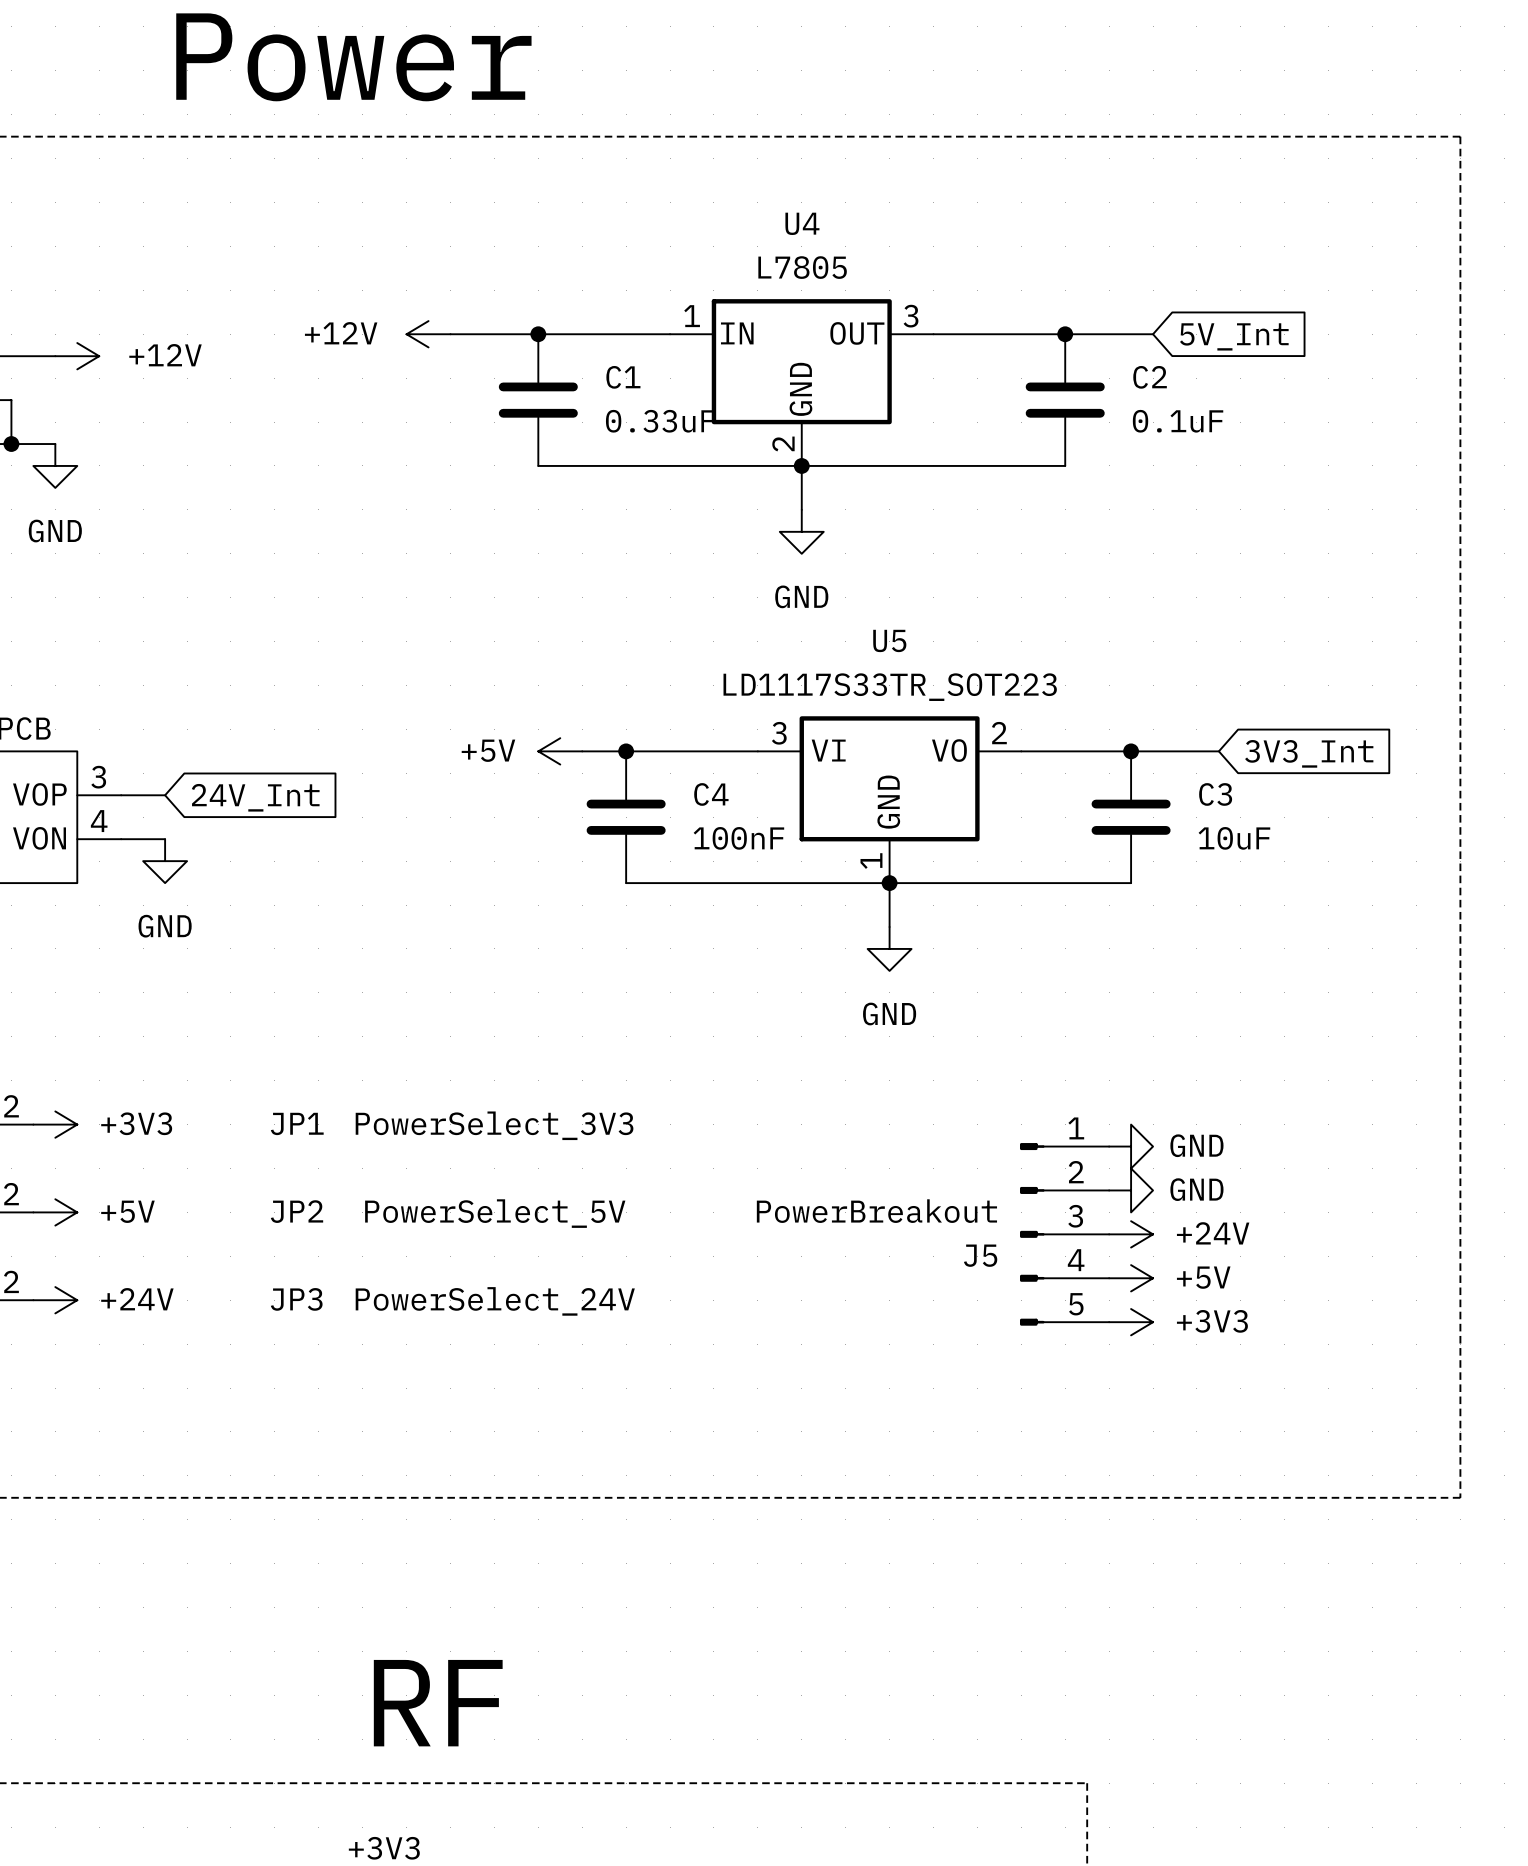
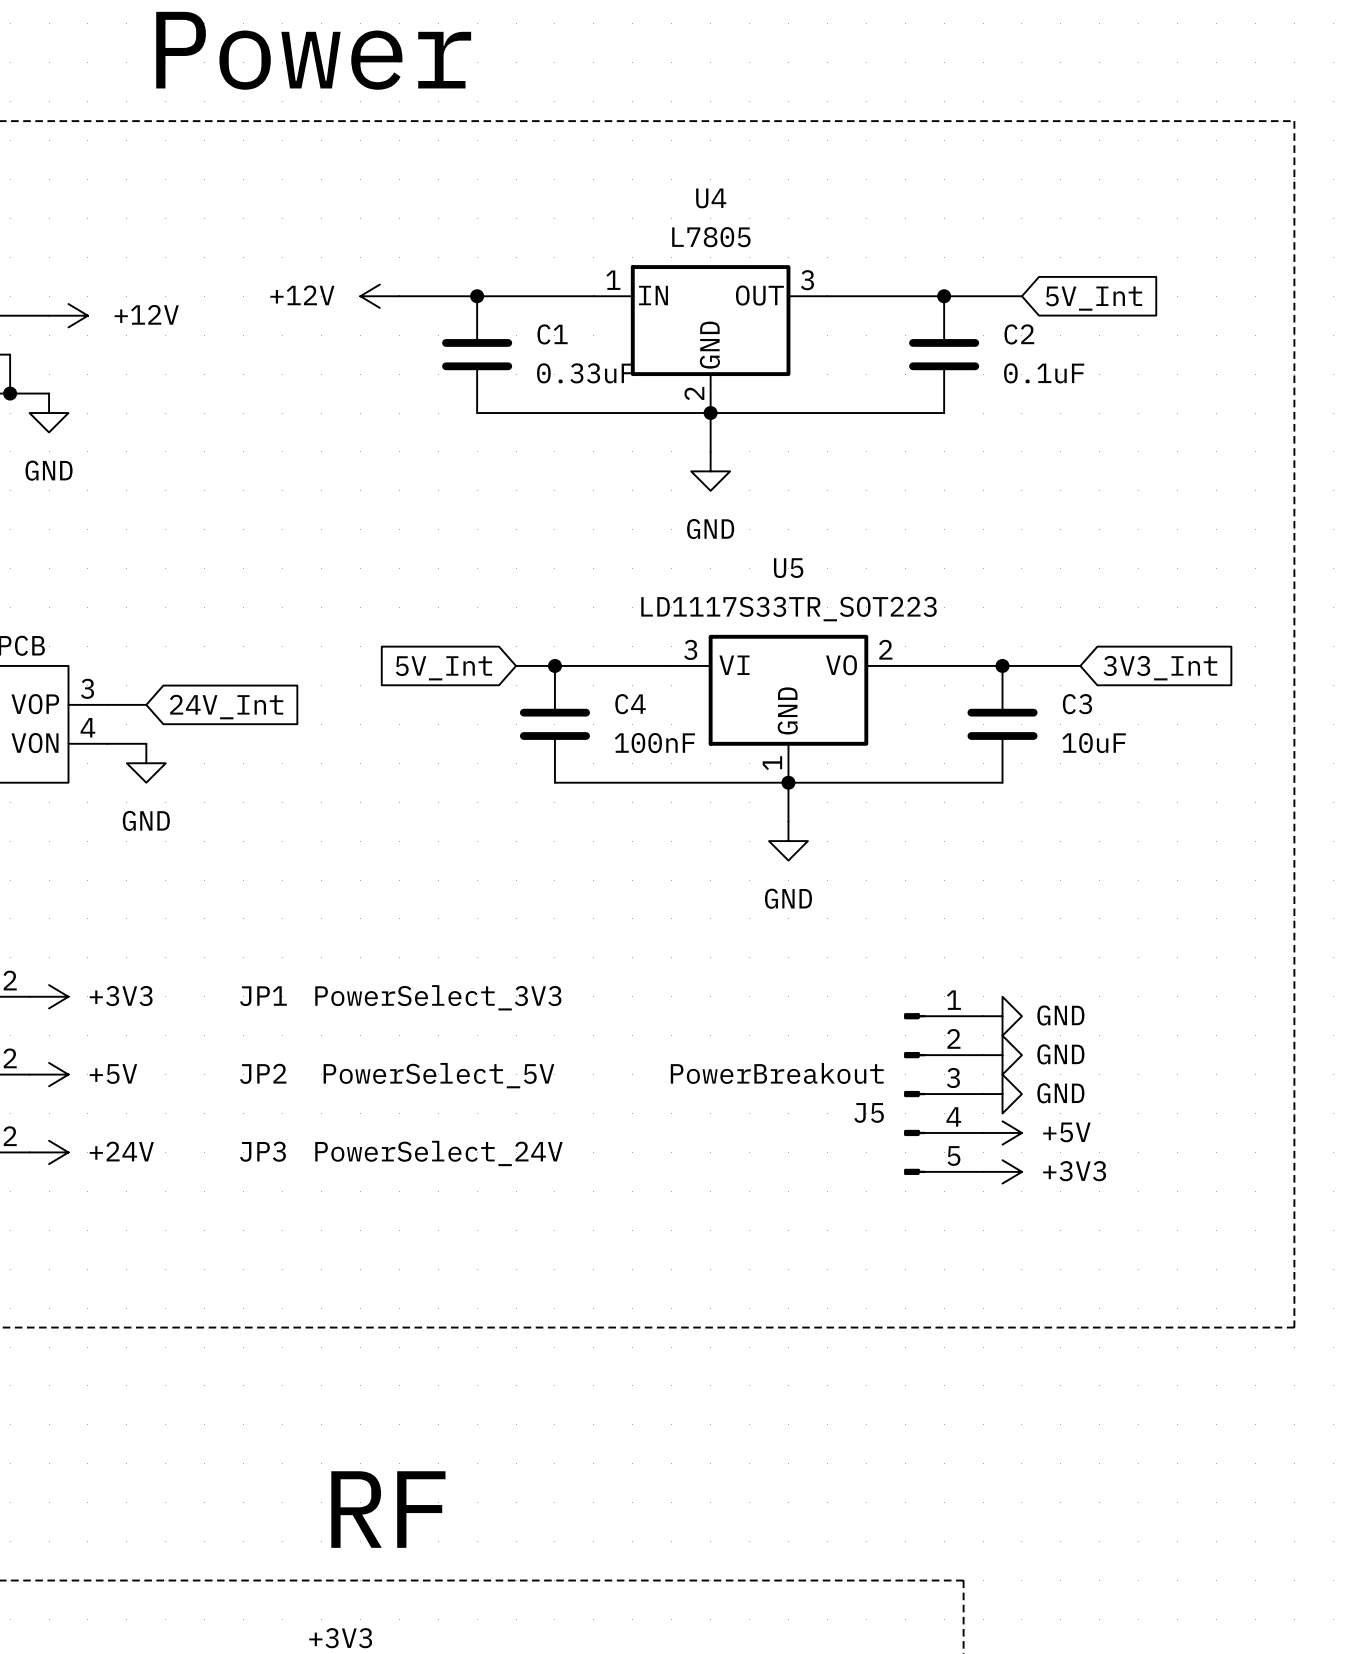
power symbol: +5V (560, 751) -> none
global label: none -> 5V_Int (443, 668)
power symbol: +24V (1131, 1234) -> GND (1002, 1094)

